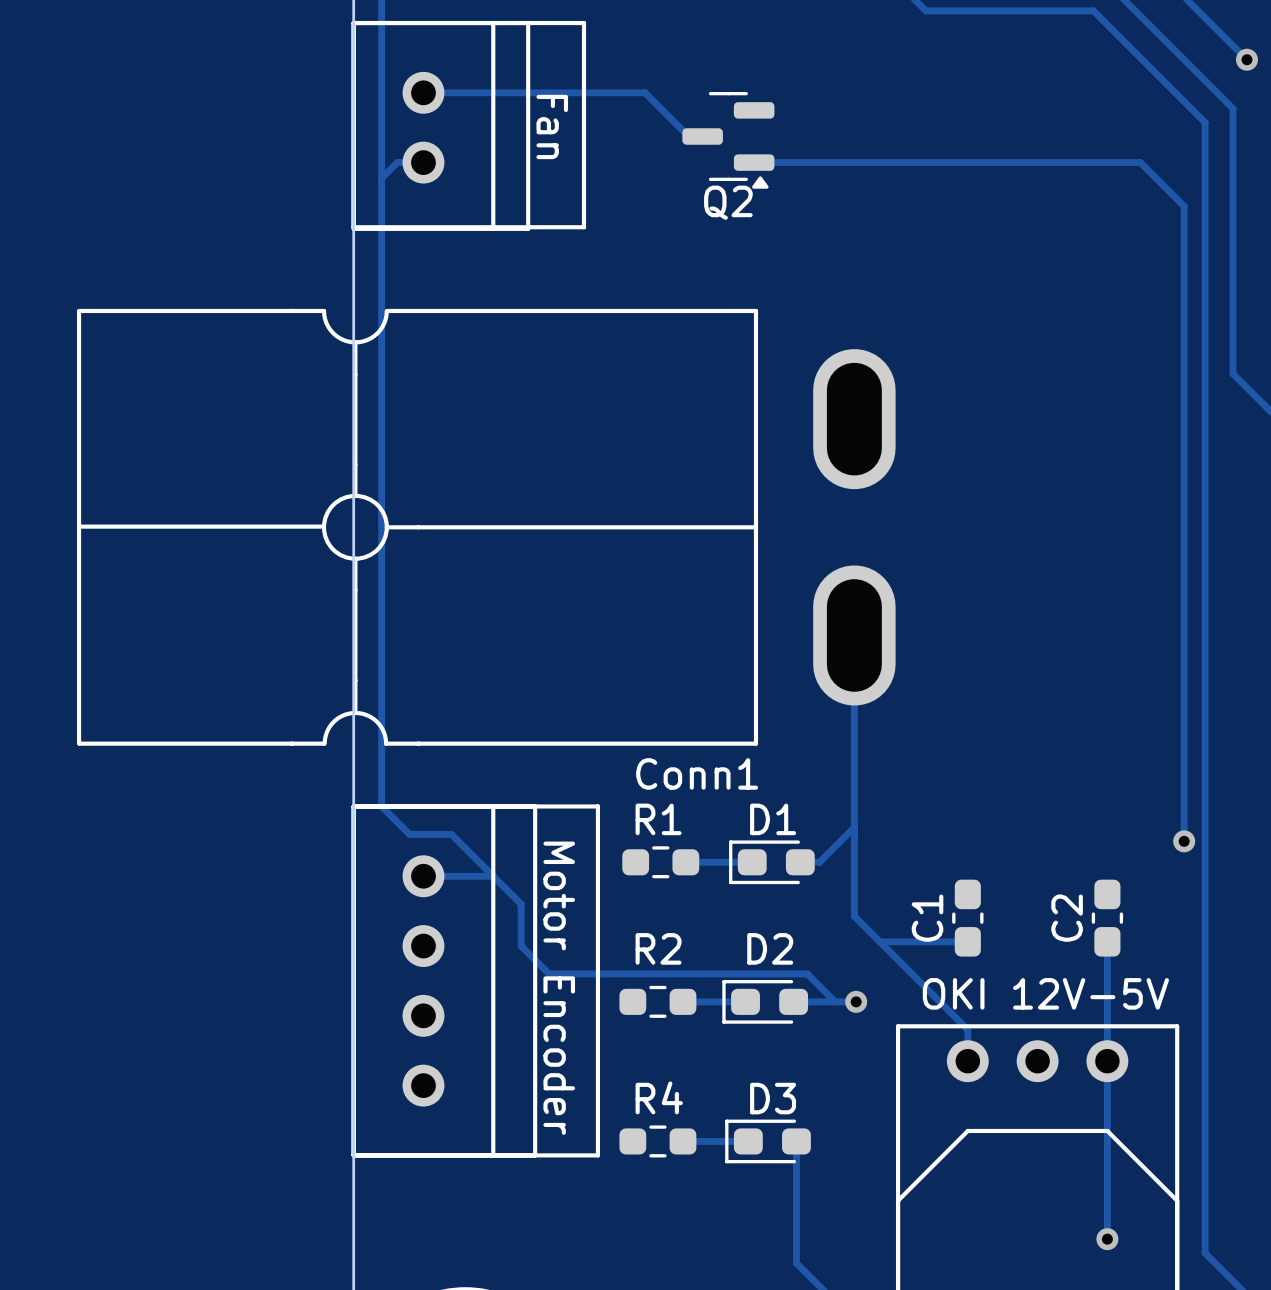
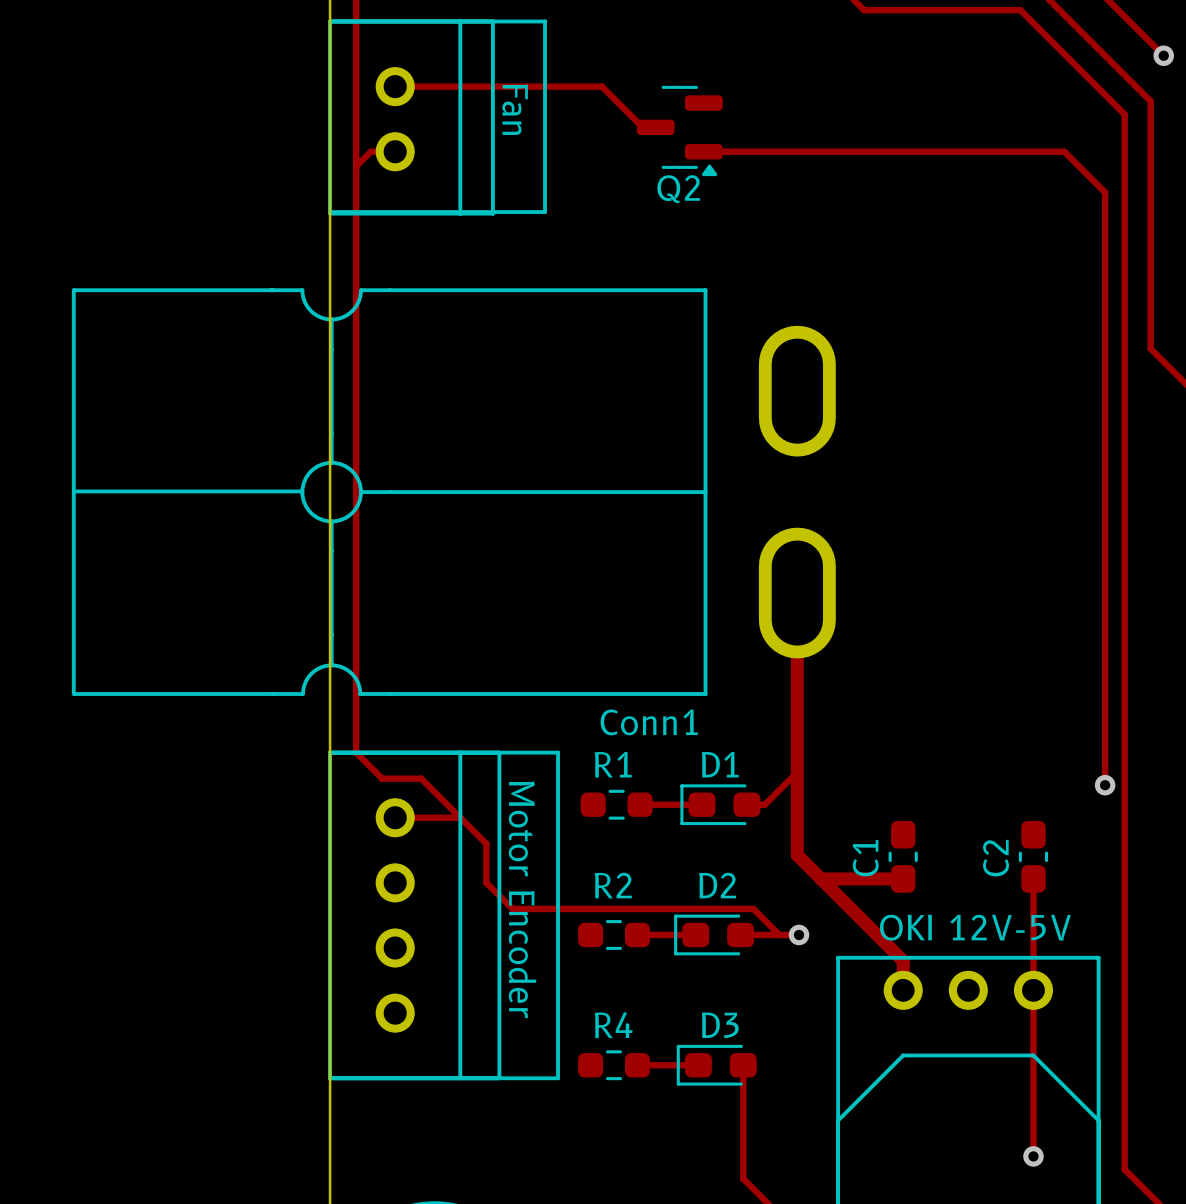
track width: thin (854, 635) (854, 916) (967, 1029) (967, 1061) -> thick (797, 593) (797, 855) (903, 961) (903, 990)
track width: thin (879, 941) (967, 941) -> thick (821, 878) (903, 878)

